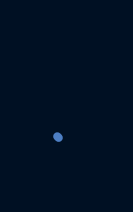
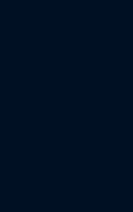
bottom track: (57, 136) (58, 137) -> none

